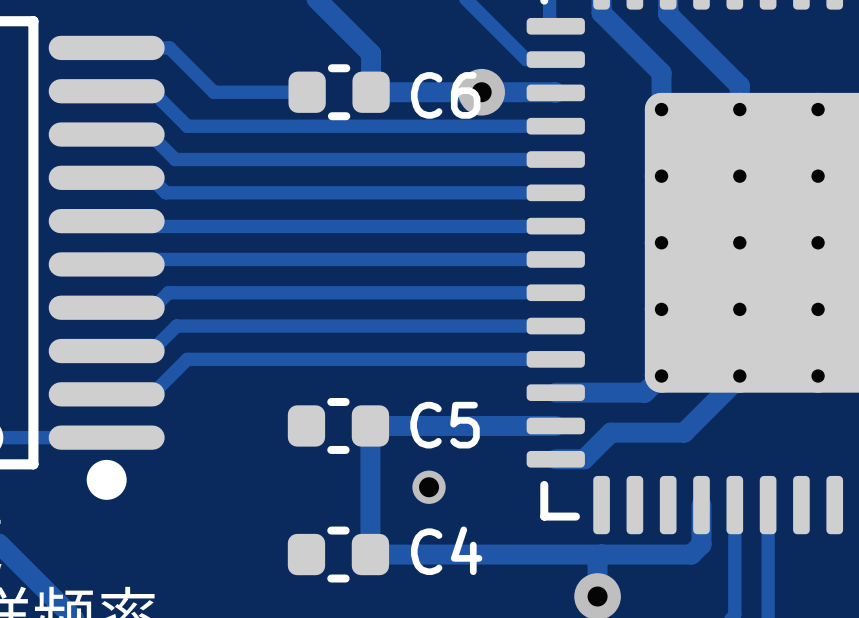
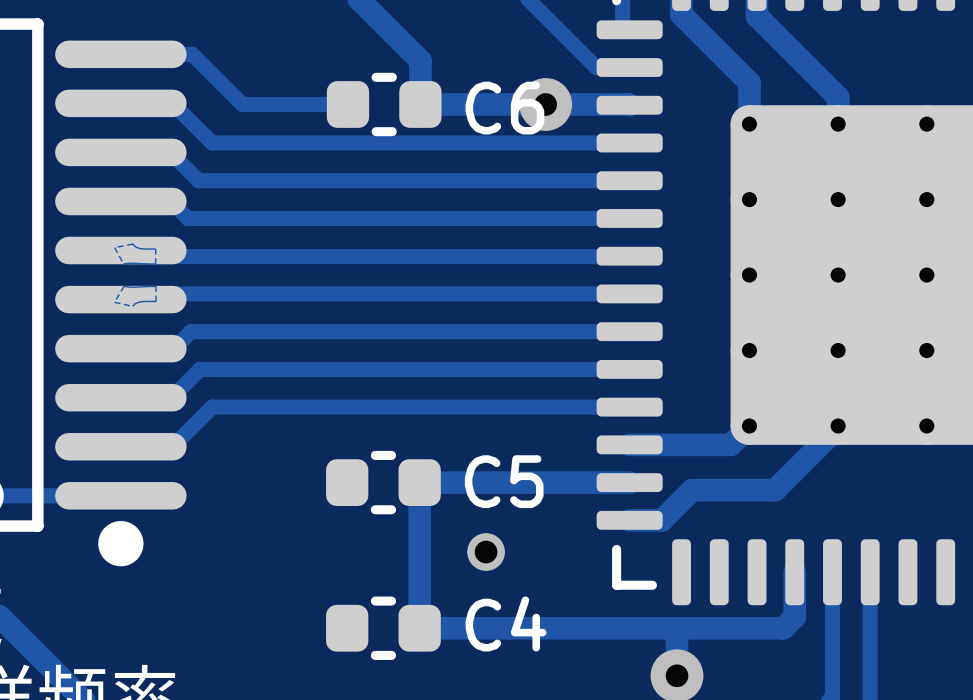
zone outline: none -> (133, 244) (138, 248) (155, 249) (155, 264) (123, 263) (114, 247) (133, 244)
zone outline: none -> (124, 286) (156, 286) (156, 301) (138, 302) (132, 306) (114, 302) (124, 286)

